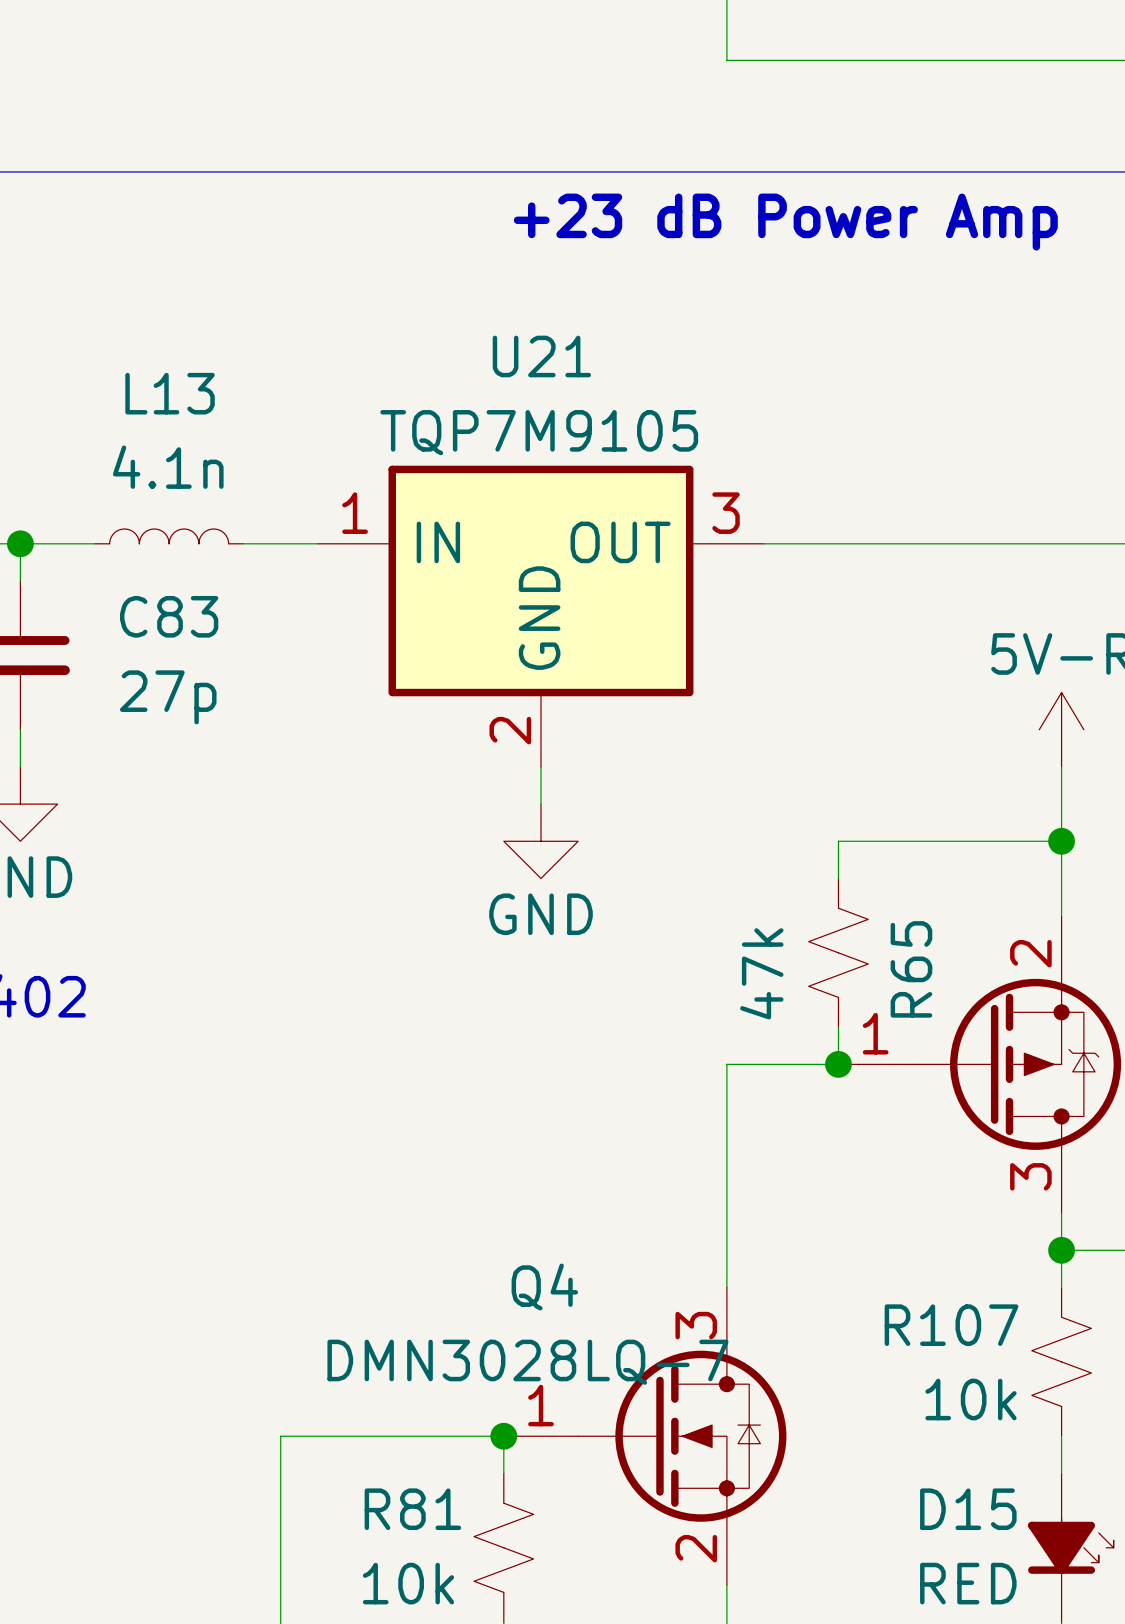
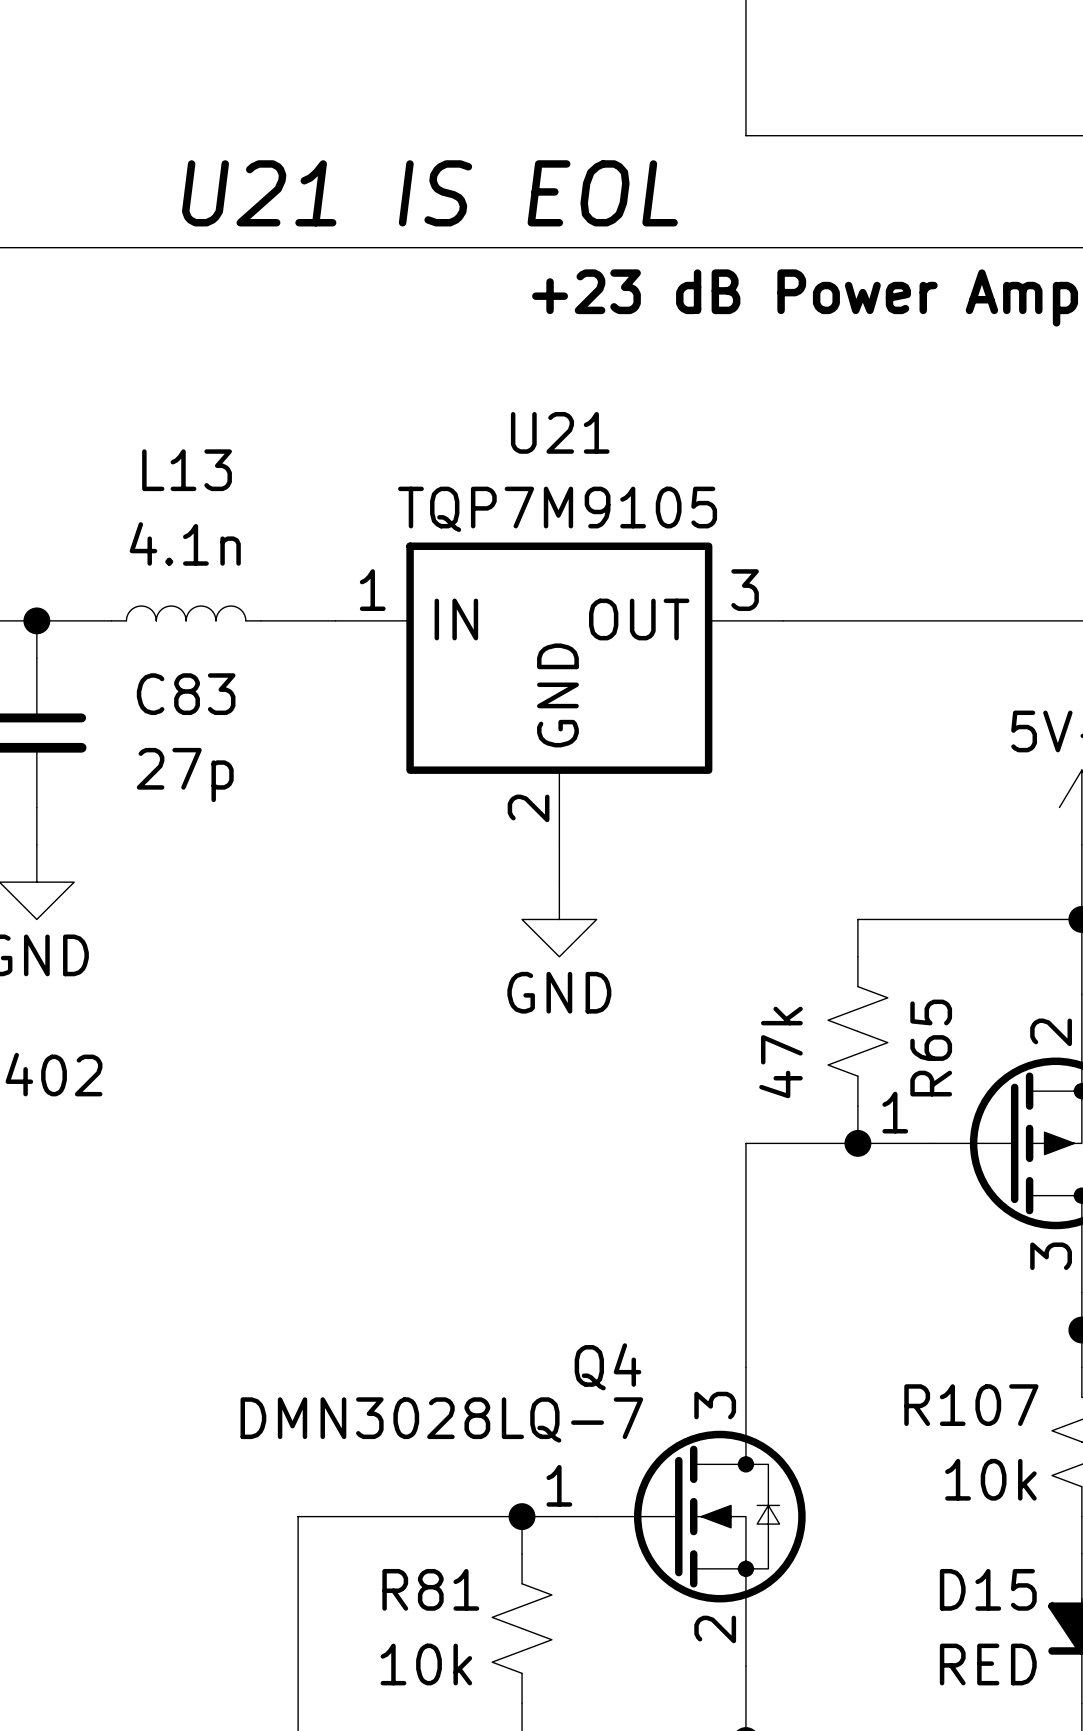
text: none -> U21 IS EOL (429, 193)
Q4 name position: Q4 (544, 1286) -> Q4 (607, 1366)
Q4 value position: DMN3028LQ-7 (527, 1362) -> DMN3028LQ-7 (441, 1419)

